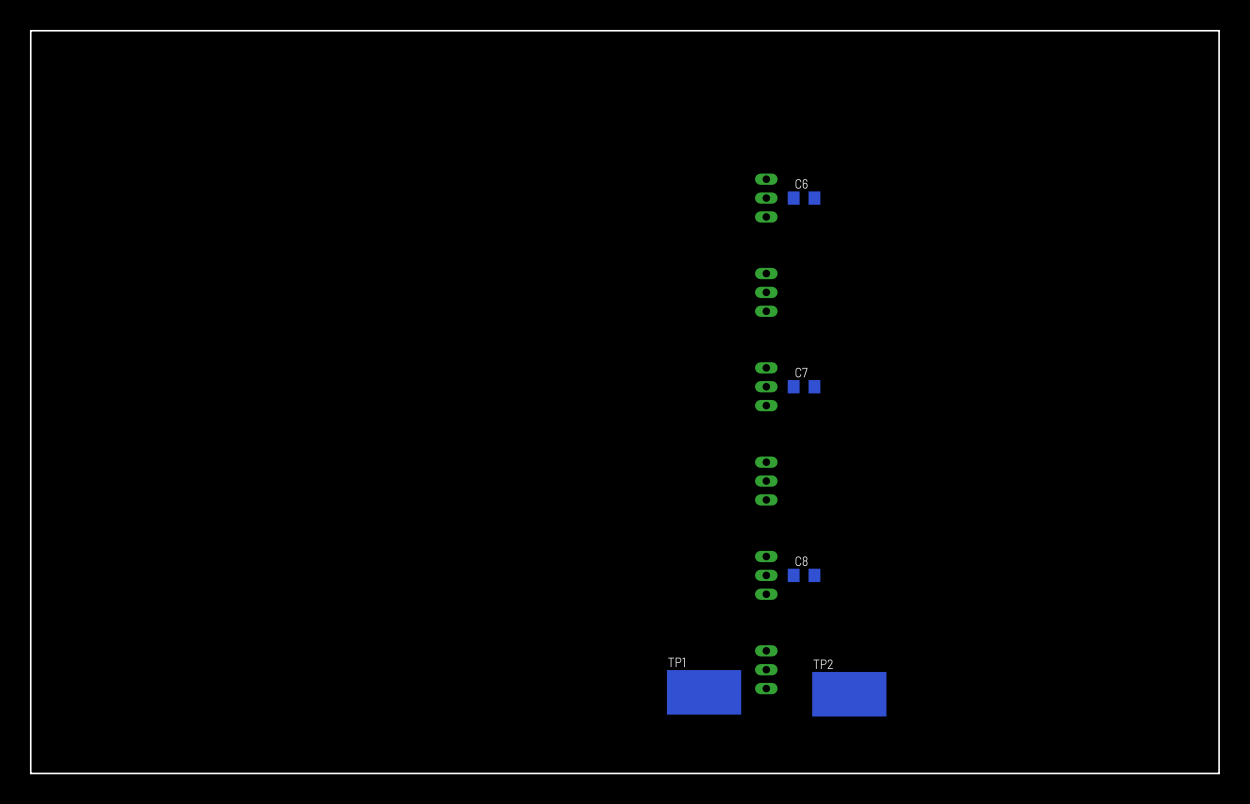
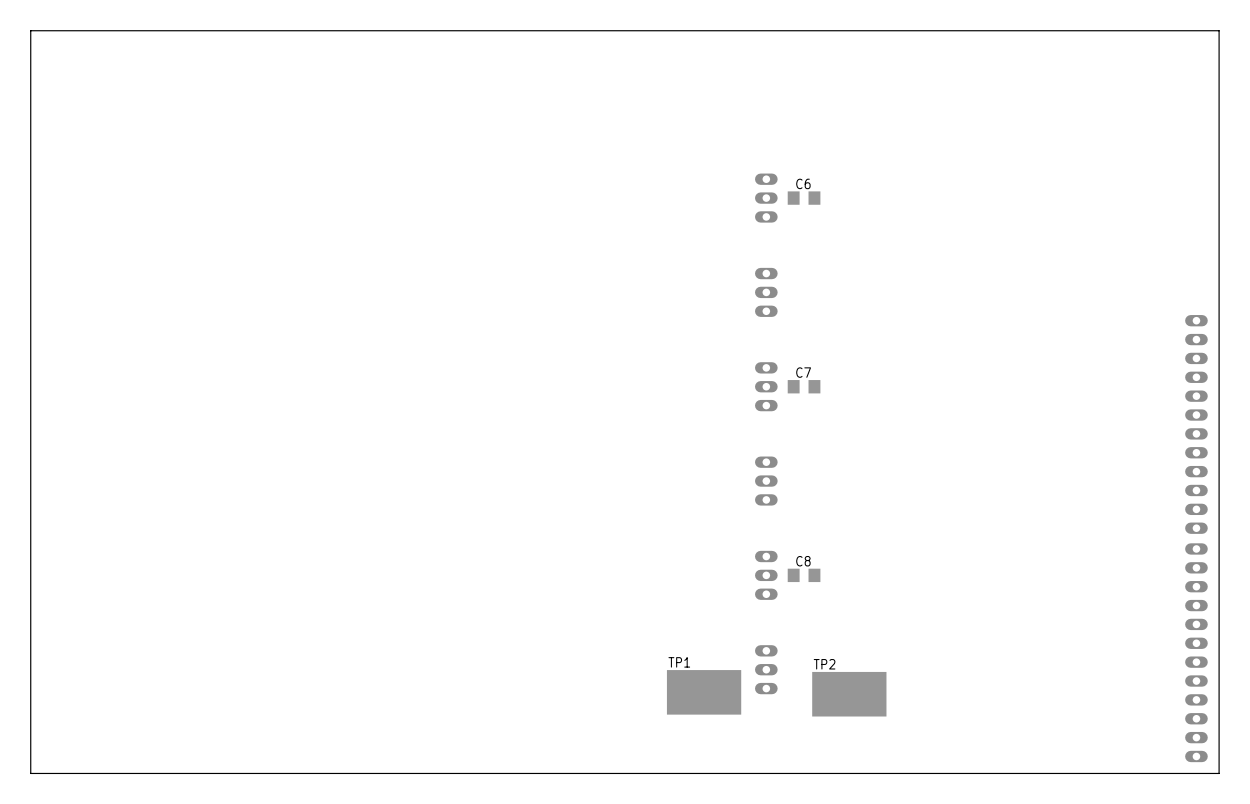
part: none -> (1196, 424)
part: none -> (1196, 652)

